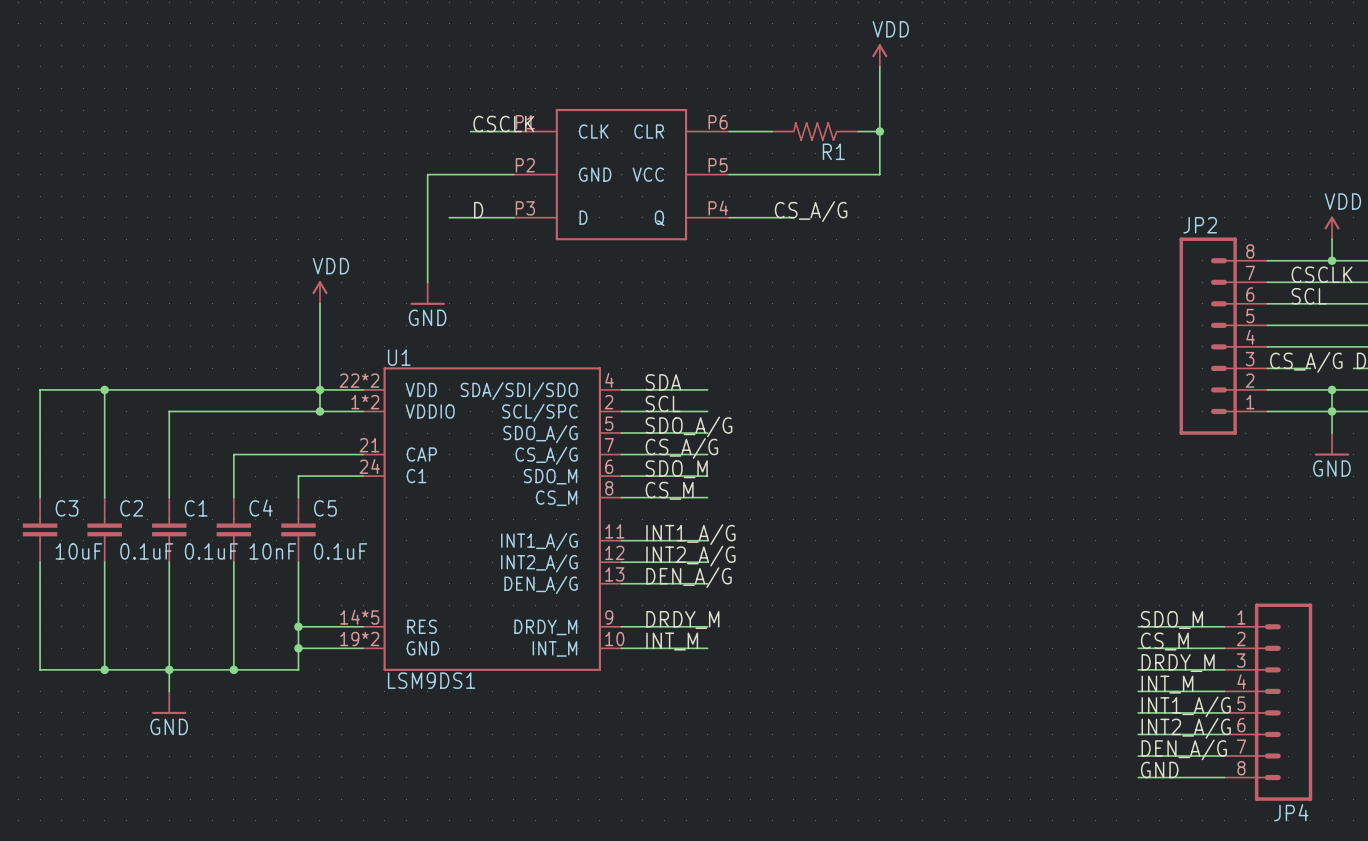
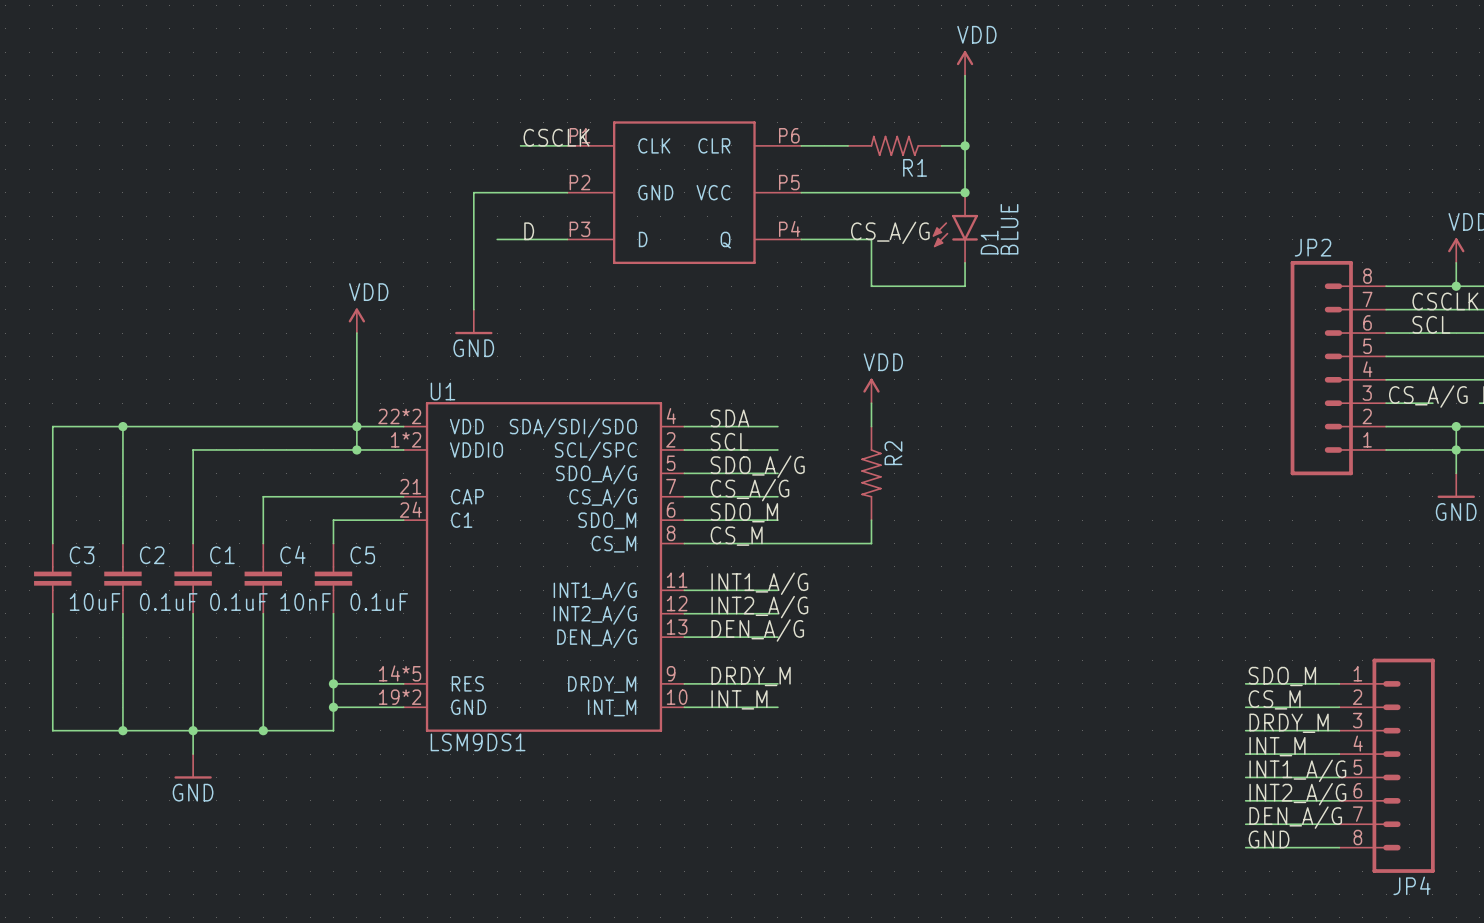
junction: none -> (965, 192)
D1: none -> BLUE (955, 227)
wire: none -> (871, 239) (871, 286) (965, 286) (965, 262)
power symbol: none -> VDD (871, 390)
wire: none -> (871, 403) (871, 426)
R2: none -> (871, 473)
wire: none -> (871, 520) (871, 543) (777, 543)

